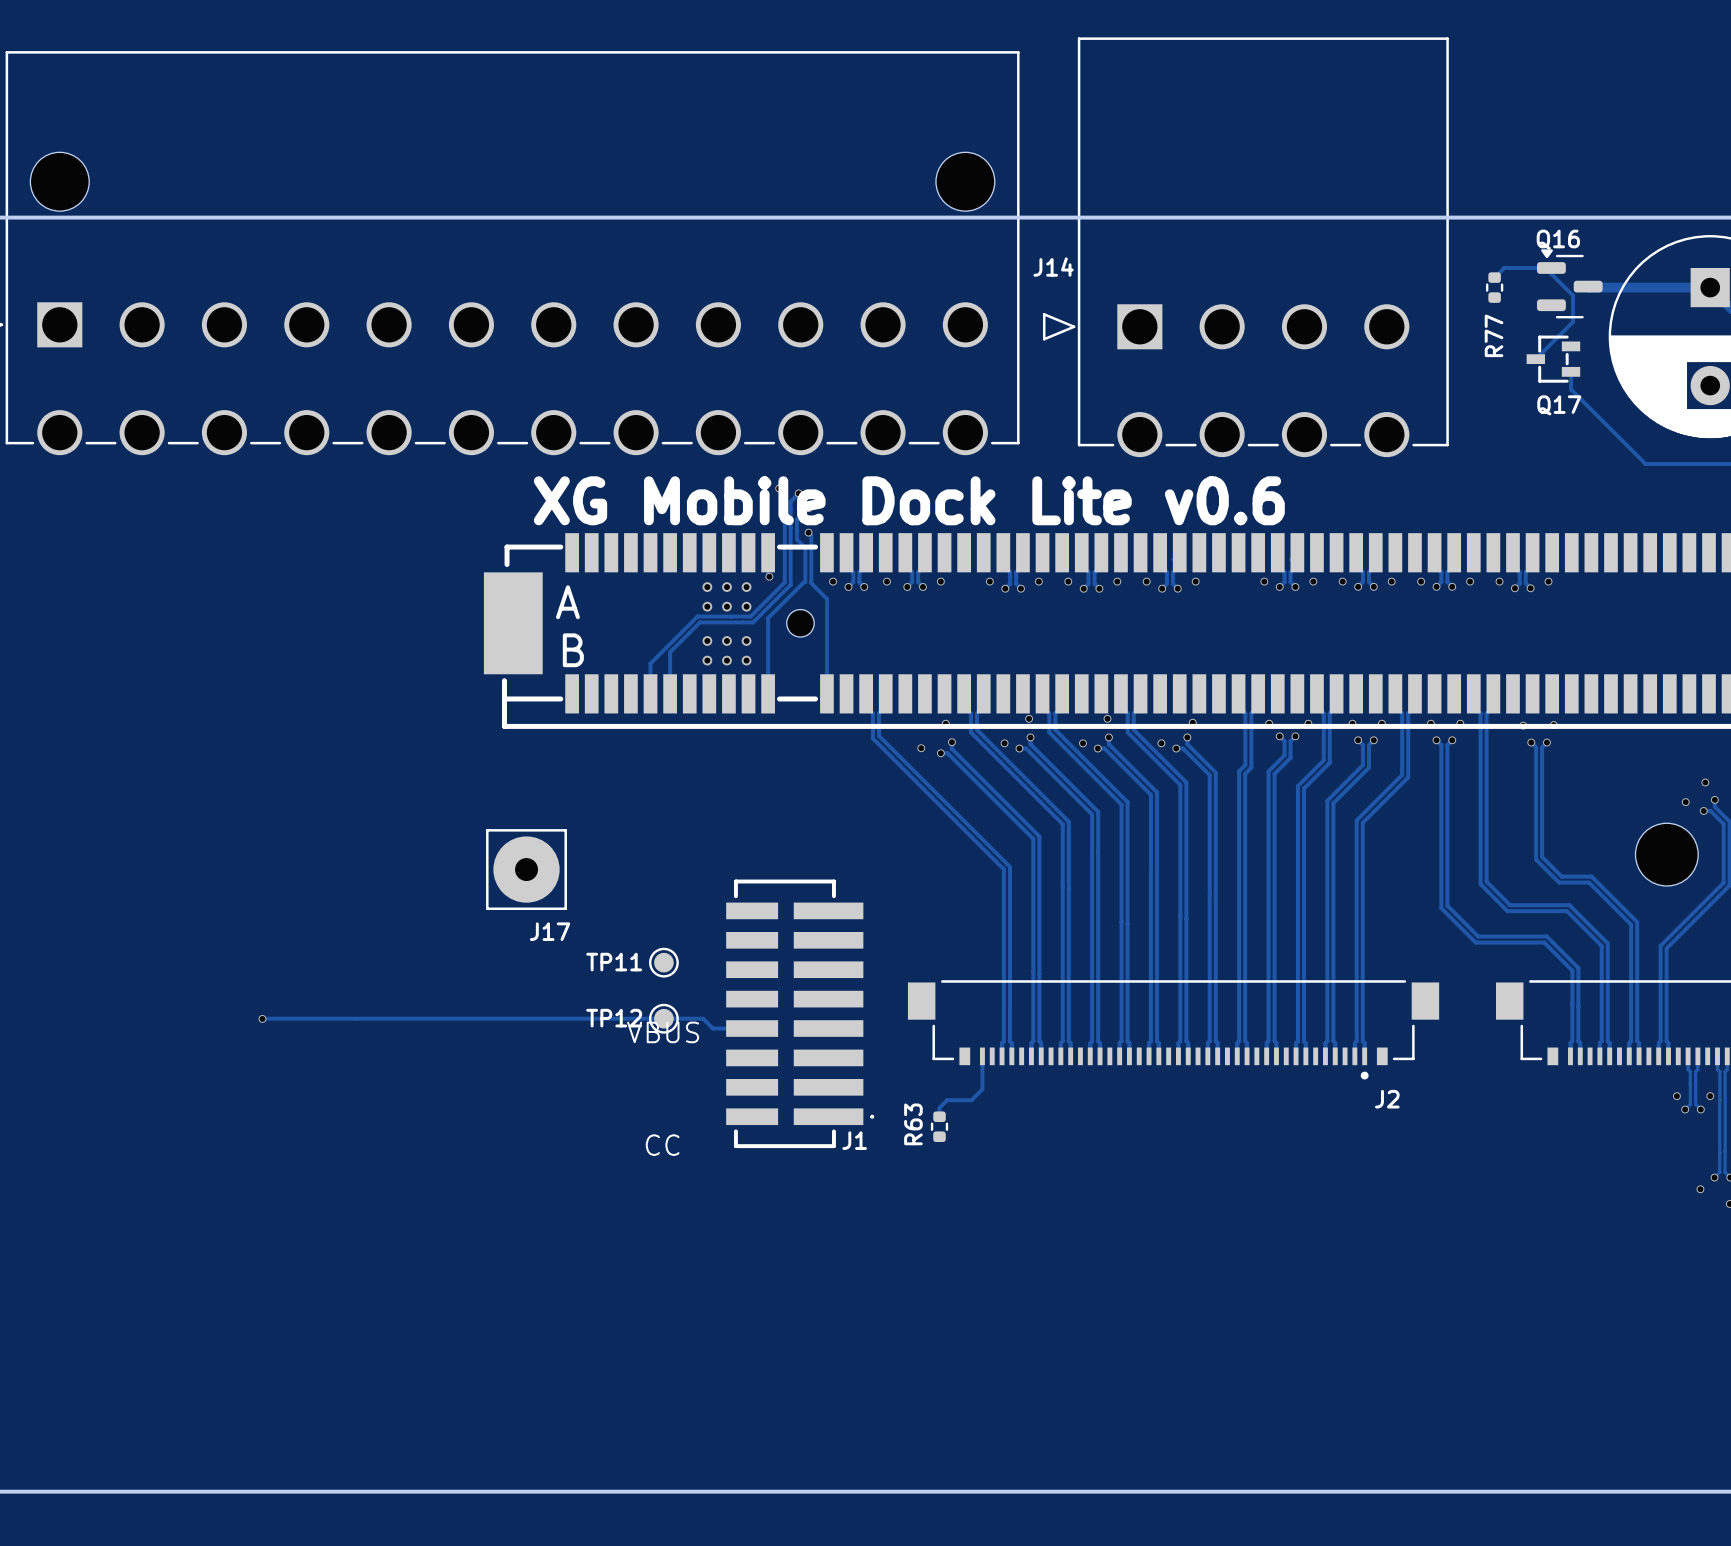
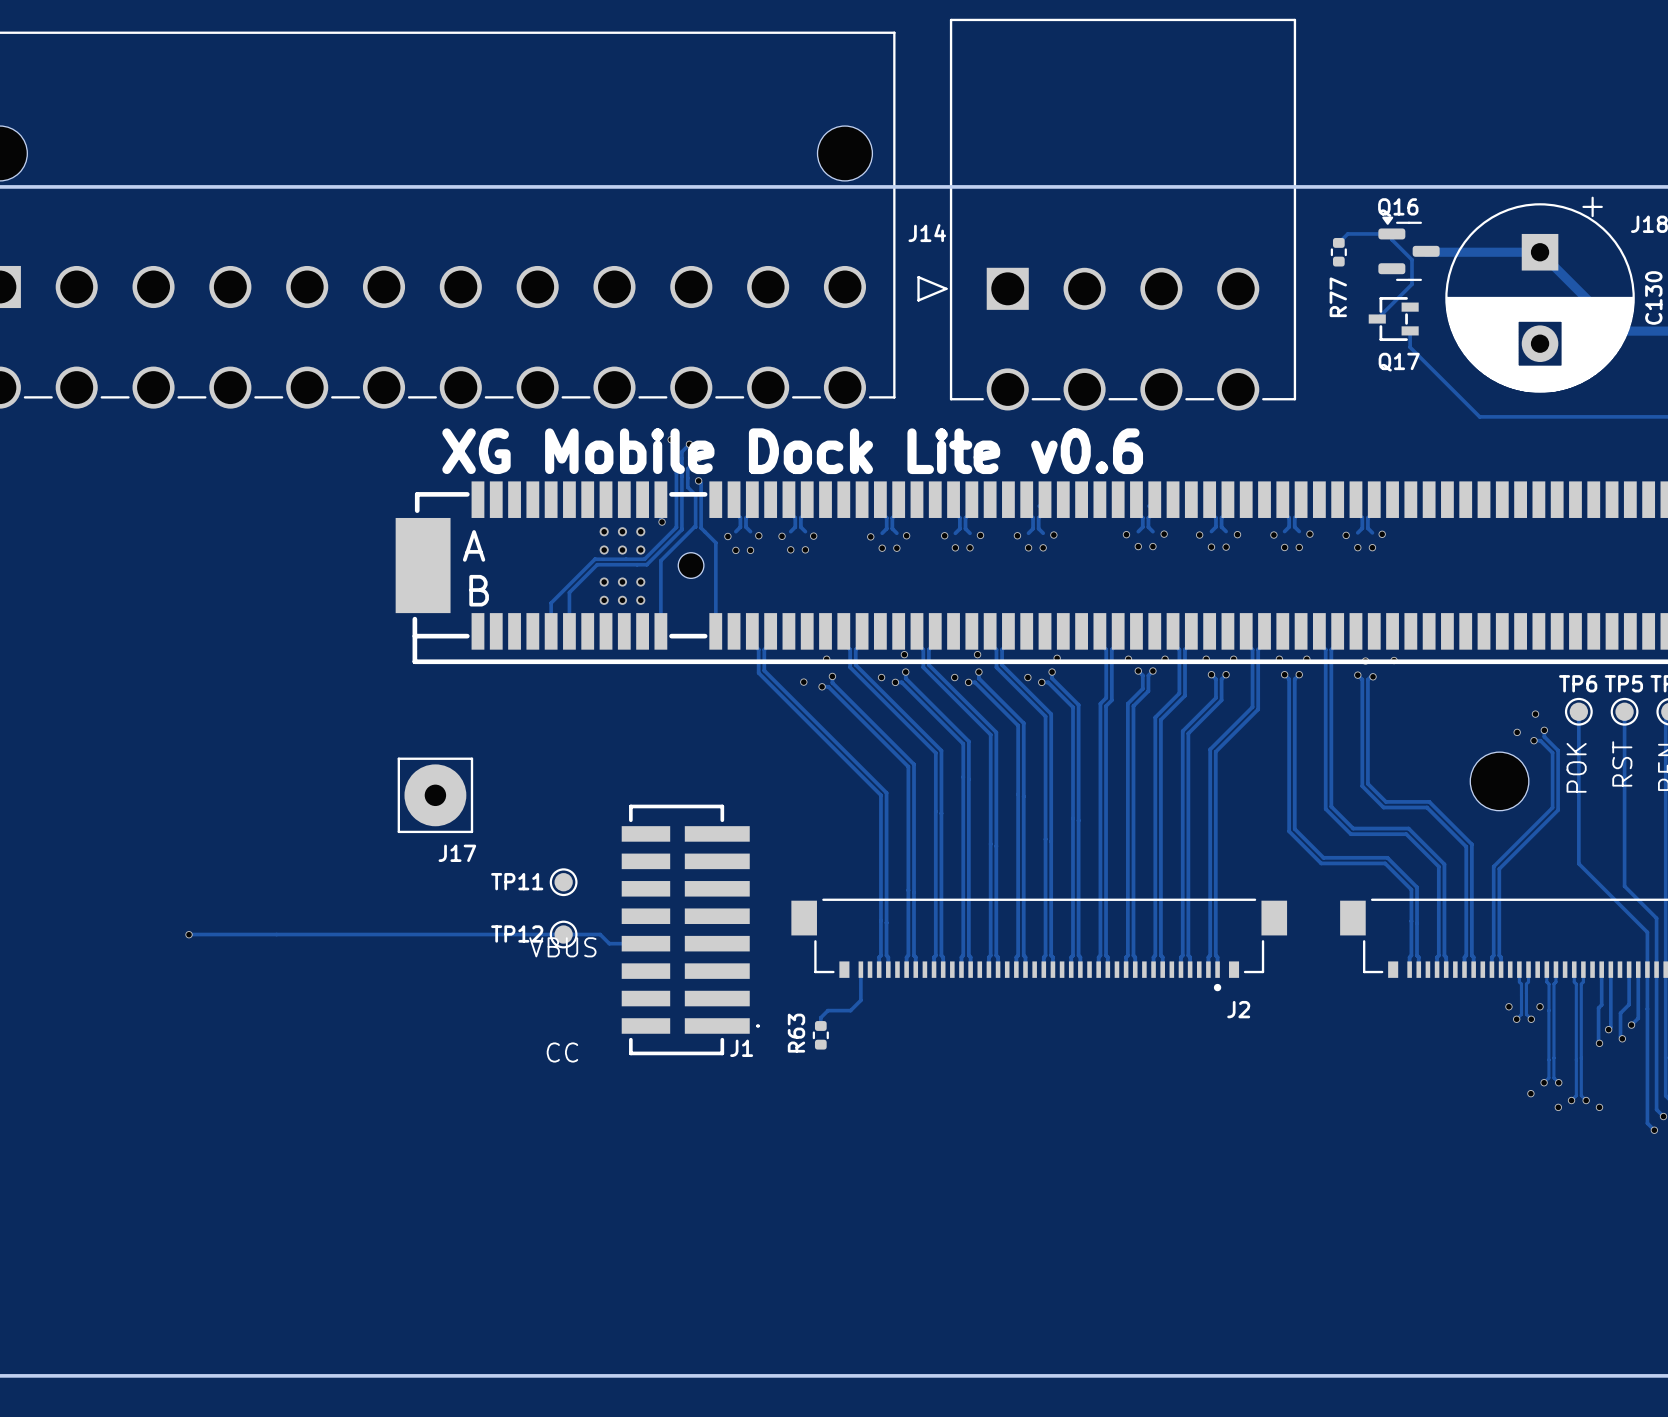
via: (833, 581) -> none
via: (886, 581) -> none
via: (940, 581) -> none
via: (989, 581) -> none
via: (1038, 581) -> none
via: (1068, 581) -> none
via: (1117, 581) -> none
via: (1146, 581) -> none
via: (1195, 581) -> none
via: (1264, 581) -> none
via: (1313, 581) -> none
via: (1342, 581) -> none
via: (1391, 581) -> none
via: (1421, 581) -> none
via: (1470, 581) -> none
via: (1499, 581) -> none
via: (1548, 581) -> none
via: (848, 586) -> none
via: (864, 586) -> none
via: (907, 586) -> none
via: (922, 586) -> none
via: (1279, 586) -> none
via: (1295, 586) -> none
via: (1358, 586) -> none
via: (1373, 586) -> none
via: (1436, 586) -> none
via: (1452, 586) -> none
via: (1005, 588) -> none
via: (1020, 588) -> none
via: (1083, 588) -> none
via: (1099, 588) -> none
via: (1162, 588) -> none
via: (1177, 588) -> none
via: (1514, 588) -> none
via: (1530, 588) -> none
via: none -> (1164, 534)
via: none -> (1309, 534)
via: none -> (1382, 534)
via: none -> (1053, 535)
via: none -> (1126, 534)
via: none -> (1199, 535)
via: none -> (1237, 534)
via: none -> (1273, 535)
via: none -> (758, 535)
via: none -> (782, 536)
via: none -> (813, 536)
via: none -> (906, 535)
via: none -> (944, 535)
via: none -> (980, 535)
via: none -> (1017, 535)
via: none -> (1346, 535)
via: none -> (727, 536)
via: none -> (870, 536)
via: none -> (1138, 546)
via: none -> (1152, 546)
via: none -> (1211, 547)
via: none -> (1226, 547)
via: none -> (1284, 547)
via: none -> (1299, 547)
via: none -> (882, 548)
via: none -> (896, 548)
via: none -> (955, 547)
via: none -> (970, 547)
via: none -> (1028, 547)
via: none -> (1043, 547)
via: none -> (1357, 547)
via: none -> (1372, 547)
via: none -> (790, 549)
via: none -> (805, 549)
via: none -> (735, 550)
via: none -> (750, 550)
track: (1531, 742) (1536, 747) (1536, 859) (1559, 882) -> (1357, 675) (1362, 679) (1362, 786) (1383, 807) (1399, 807)
track: (1546, 742) (1542, 747) (1542, 857) (1561, 876) -> (1372, 675) (1367, 679) (1367, 783) (1385, 801) (1401, 801)
via position: (1546, 742) -> (1357, 675)

